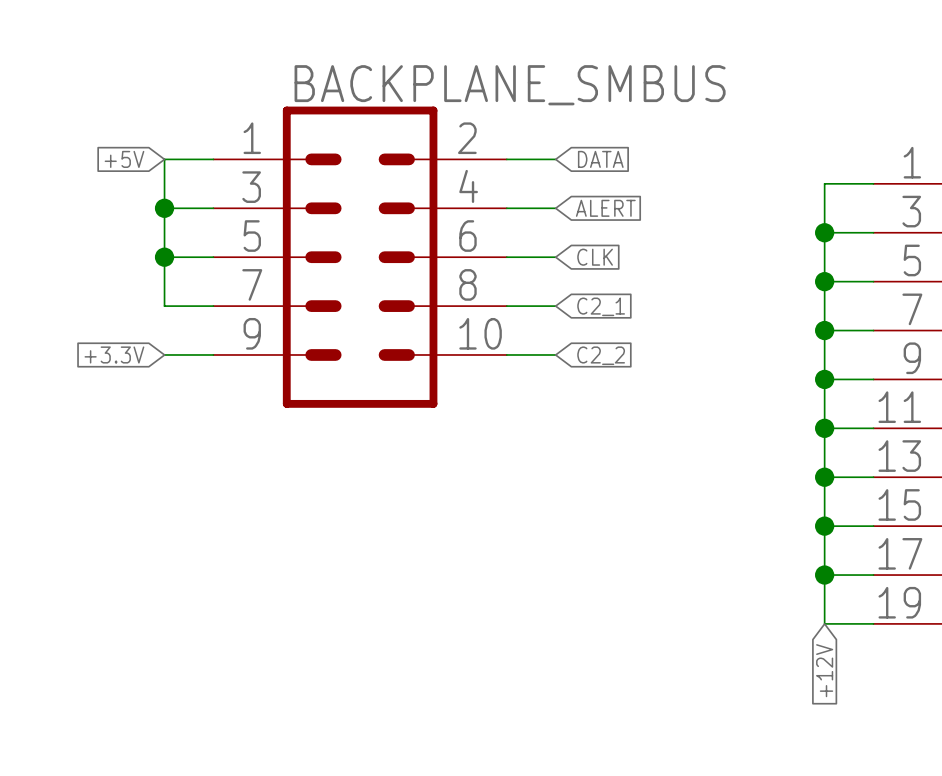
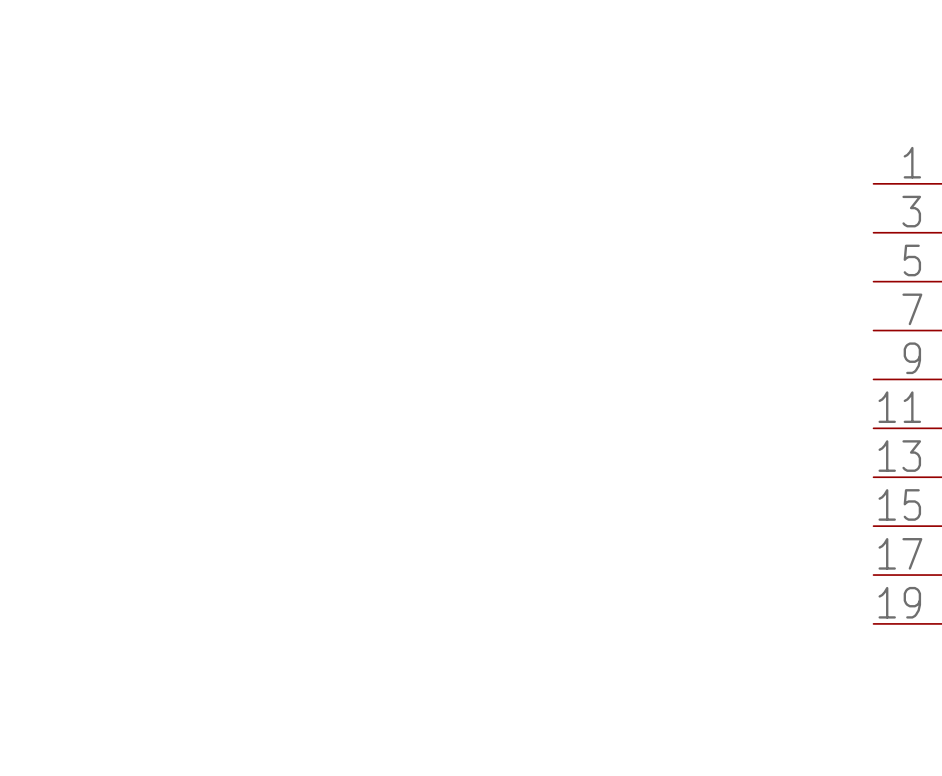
global label: +5V (124, 159) -> none
wire: (213, 159) (164, 159) (164, 306) (213, 306) -> none
wire: (506, 159) (555, 159) -> none
global label: DATA (600, 159) -> none
wire: (873, 183) (824, 183) (824, 623) (873, 623) -> none
wire: (164, 208) (213, 208) -> none
junction: (164, 208) -> none
wire: (506, 208) (555, 208) -> none
global label: ALERT (605, 208) -> none
wire: (824, 232) (873, 232) -> none
junction: (824, 232) -> none
wire: (164, 257) (213, 257) -> none
junction: (164, 257) -> none
BACKPLANE_SMBUS: (360, 257) -> none
wire: (506, 257) (555, 257) -> none
global label: CLK (595, 257) -> none
wire: (824, 281) (873, 281) -> none
junction: (824, 281) -> none
wire: (506, 306) (555, 306) -> none
global label: C2_1 (601, 306) -> none
wire: (824, 330) (873, 330) -> none
junction: (824, 330) -> none
global label: +3.3V (114, 354) -> none
wire: (164, 354) (213, 354) -> none
wire: (506, 354) (555, 354) -> none
global label: C2_2 (601, 355) -> none
wire: (824, 379) (873, 379) -> none
junction: (824, 379) -> none
wire: (824, 428) (873, 428) -> none
junction: (824, 428) -> none
wire: (824, 477) (873, 477) -> none
junction: (824, 477) -> none
wire: (824, 526) (873, 526) -> none
junction: (824, 526) -> none
wire: (824, 575) (873, 575) -> none
junction: (824, 575) -> none
global label: +12V (824, 670) -> none

